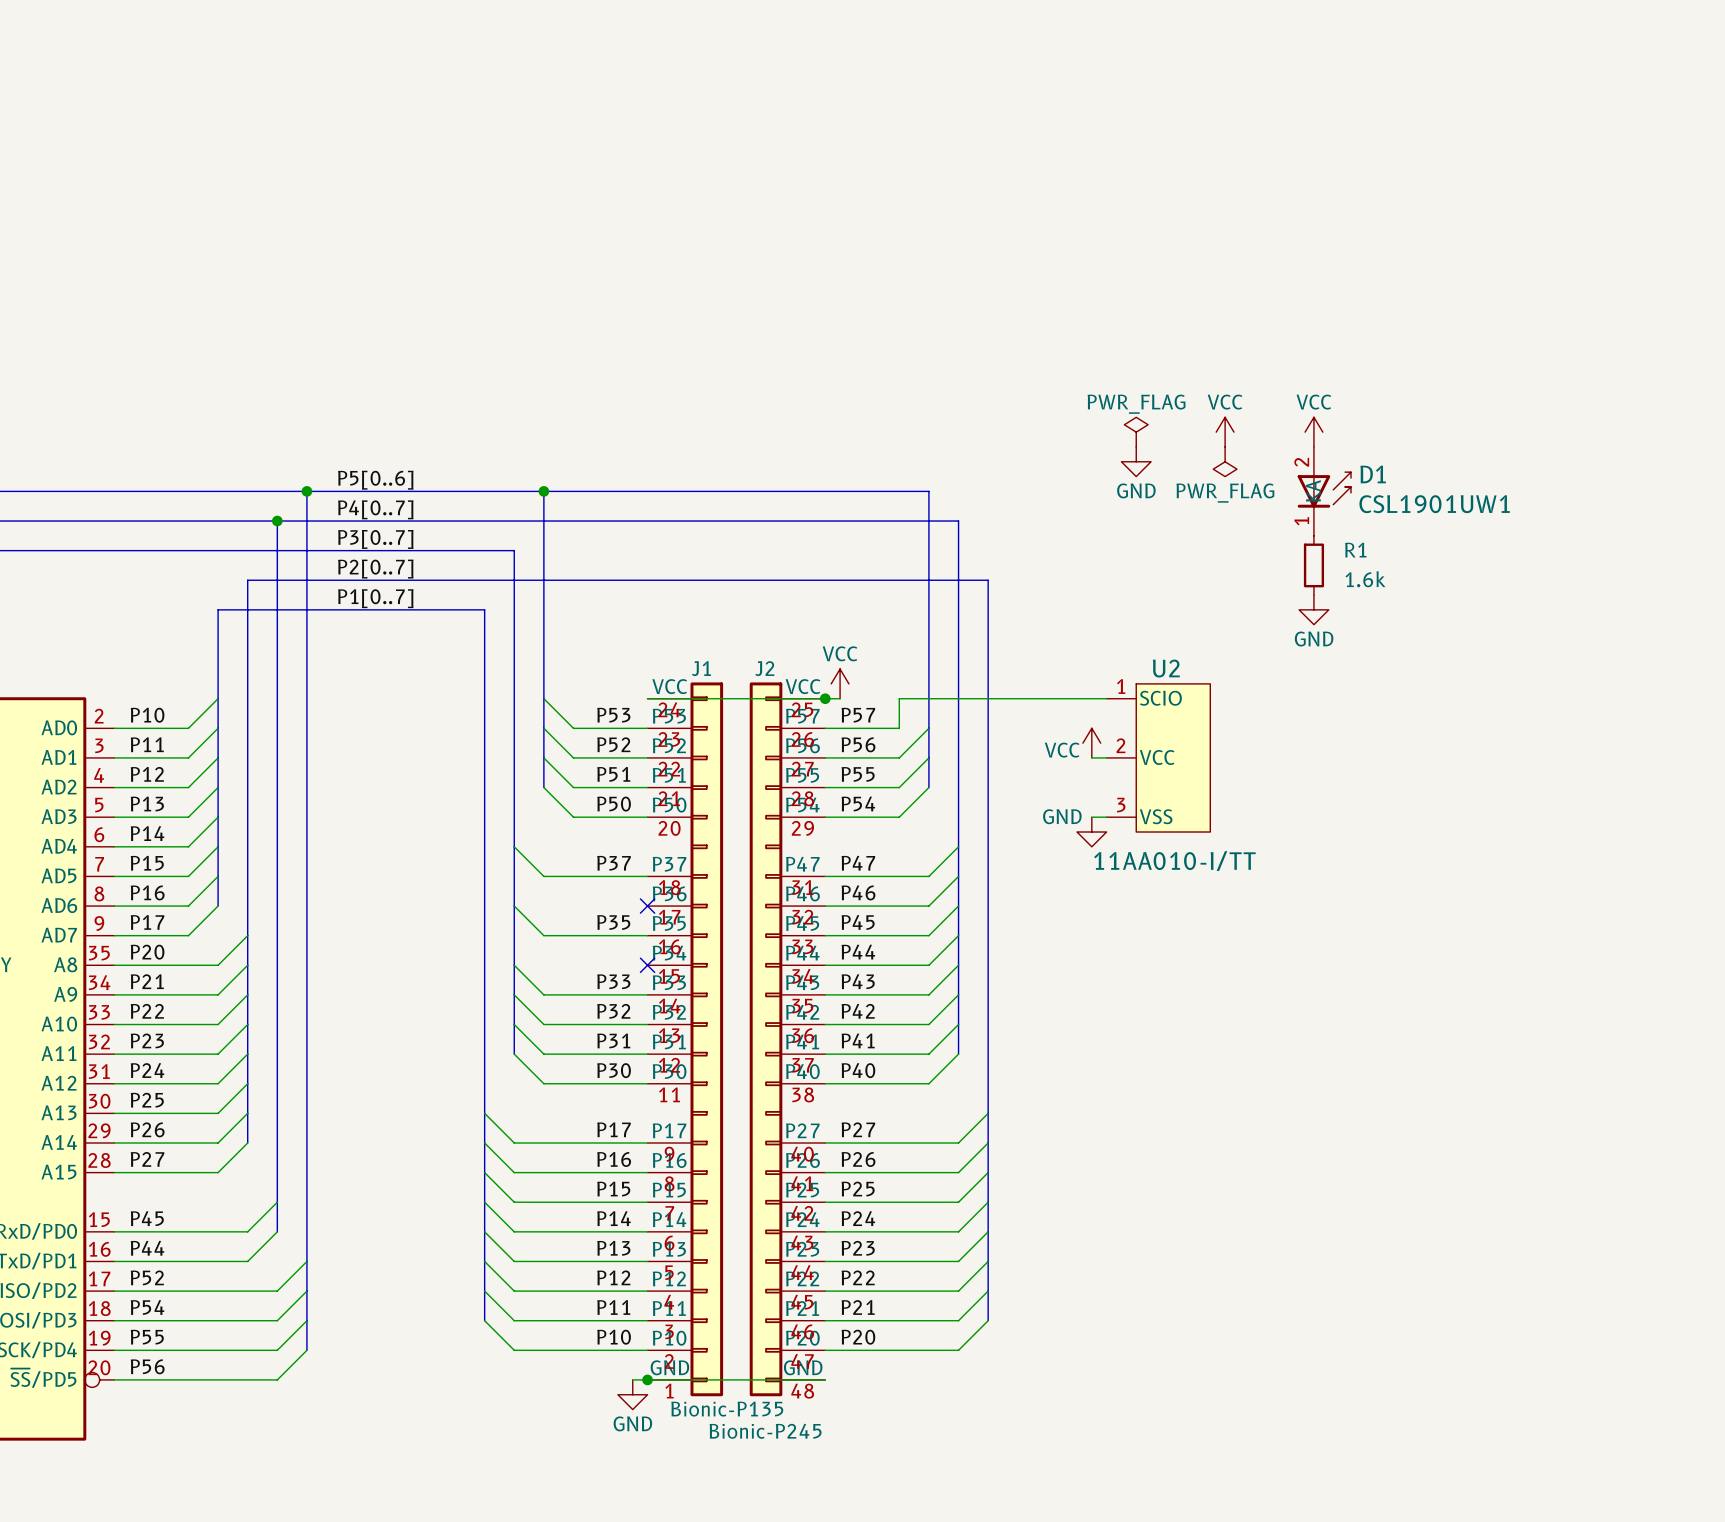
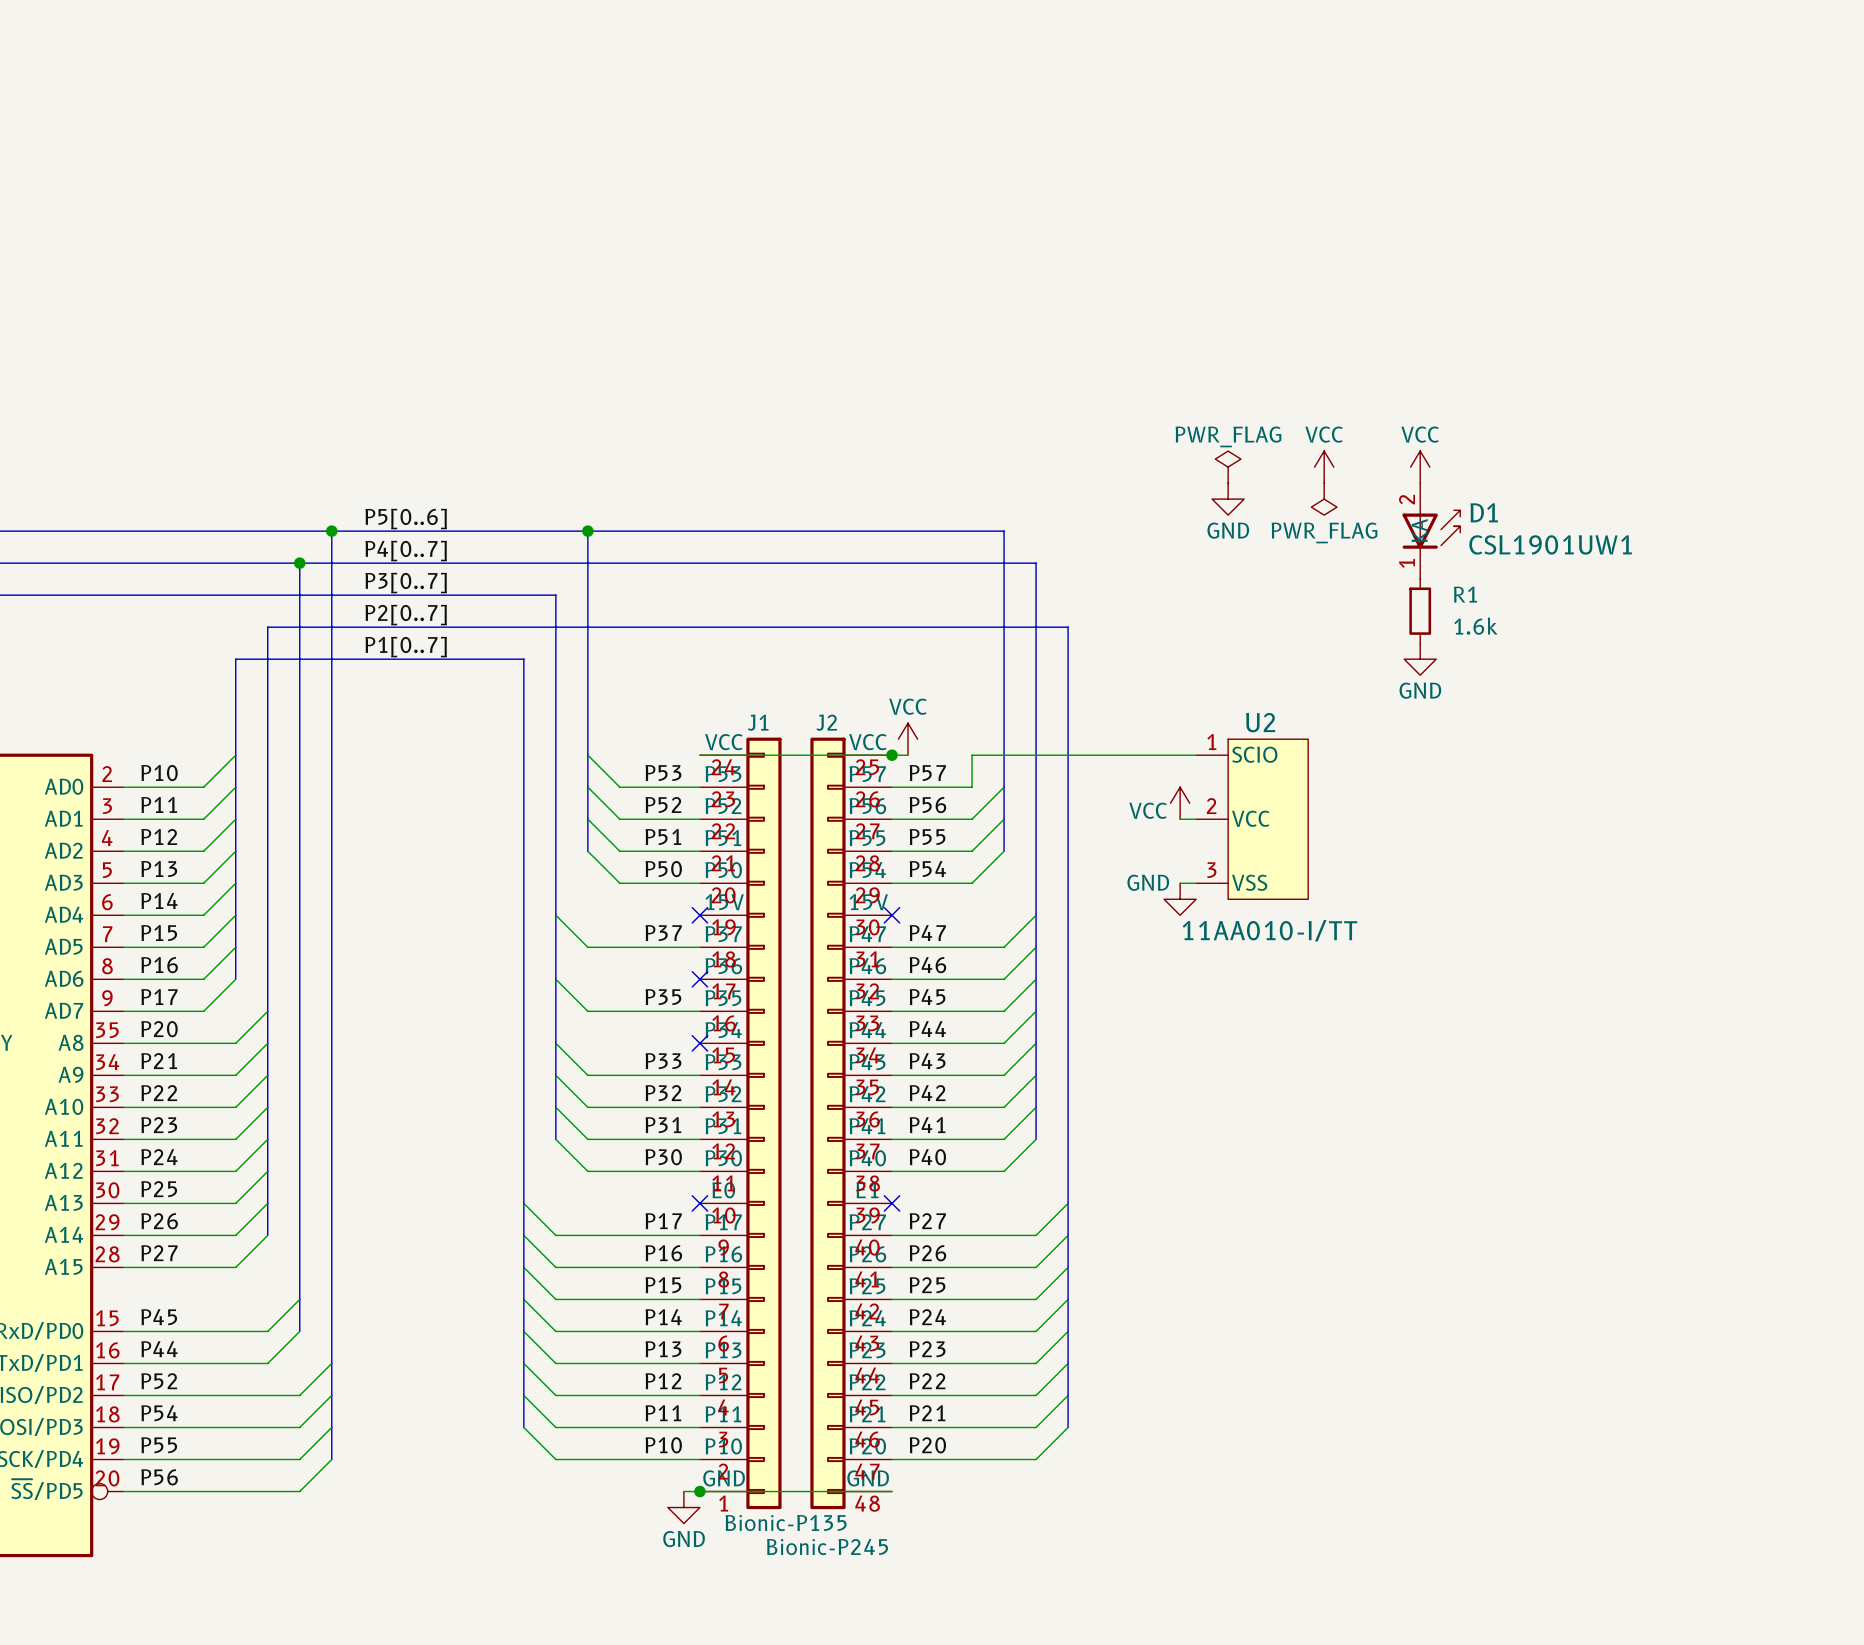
J1 symbol: [647, 682, 724, 1397] -> [699, 737, 782, 1510]
J2 symbol: [749, 682, 826, 1397] -> [810, 737, 892, 1510]
no-connect mark: none -> (699, 915)
no-connect mark: none -> (891, 915)
no-connect mark: none -> (699, 1203)
no-connect mark: none -> (891, 1203)

